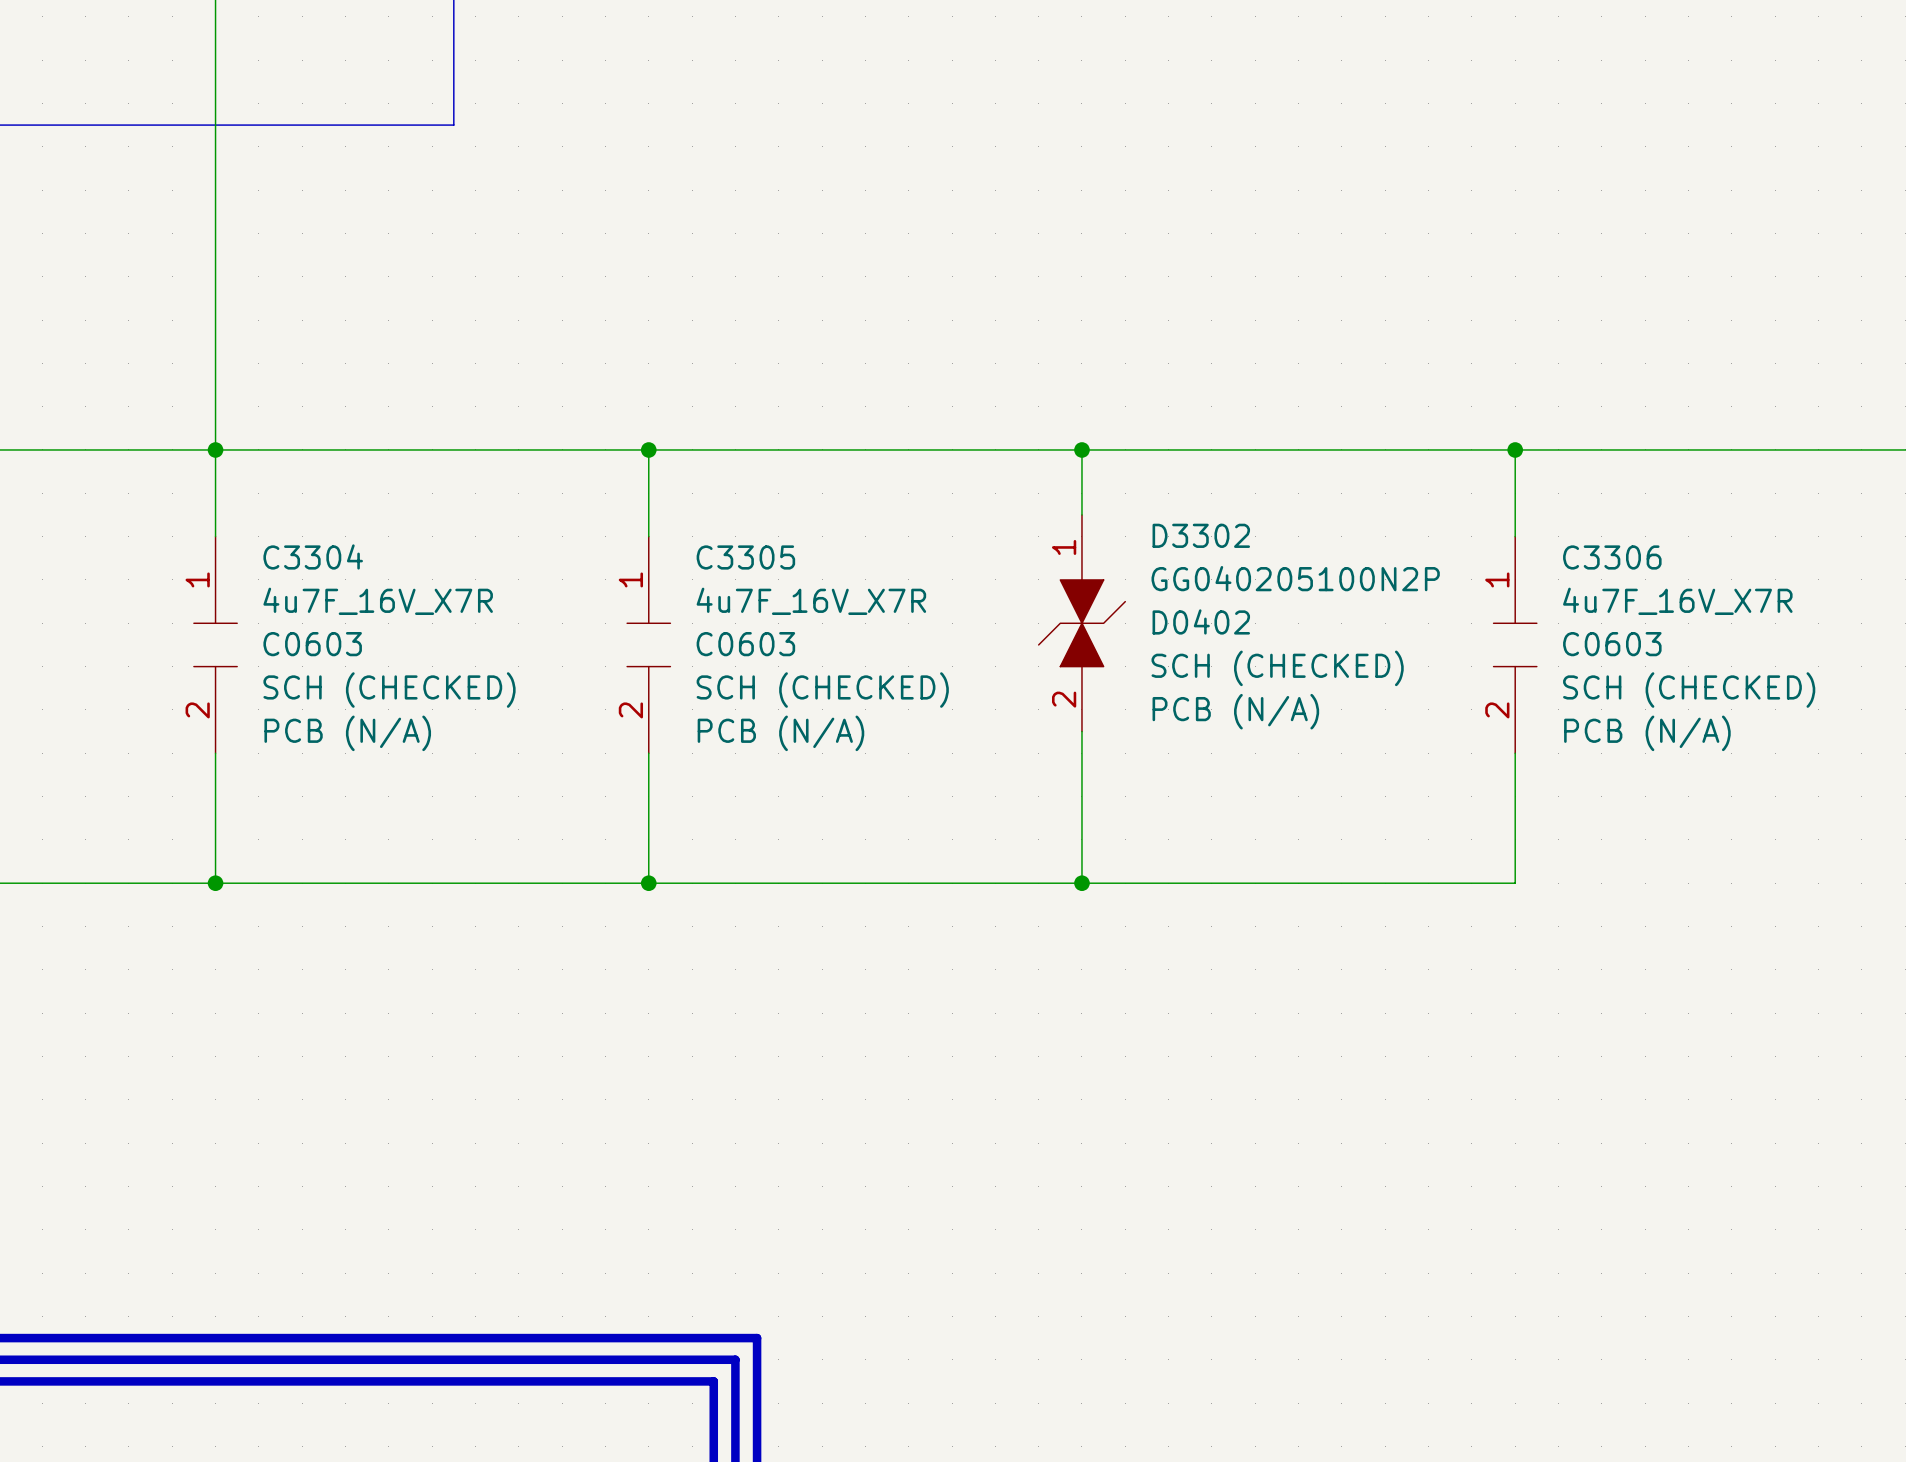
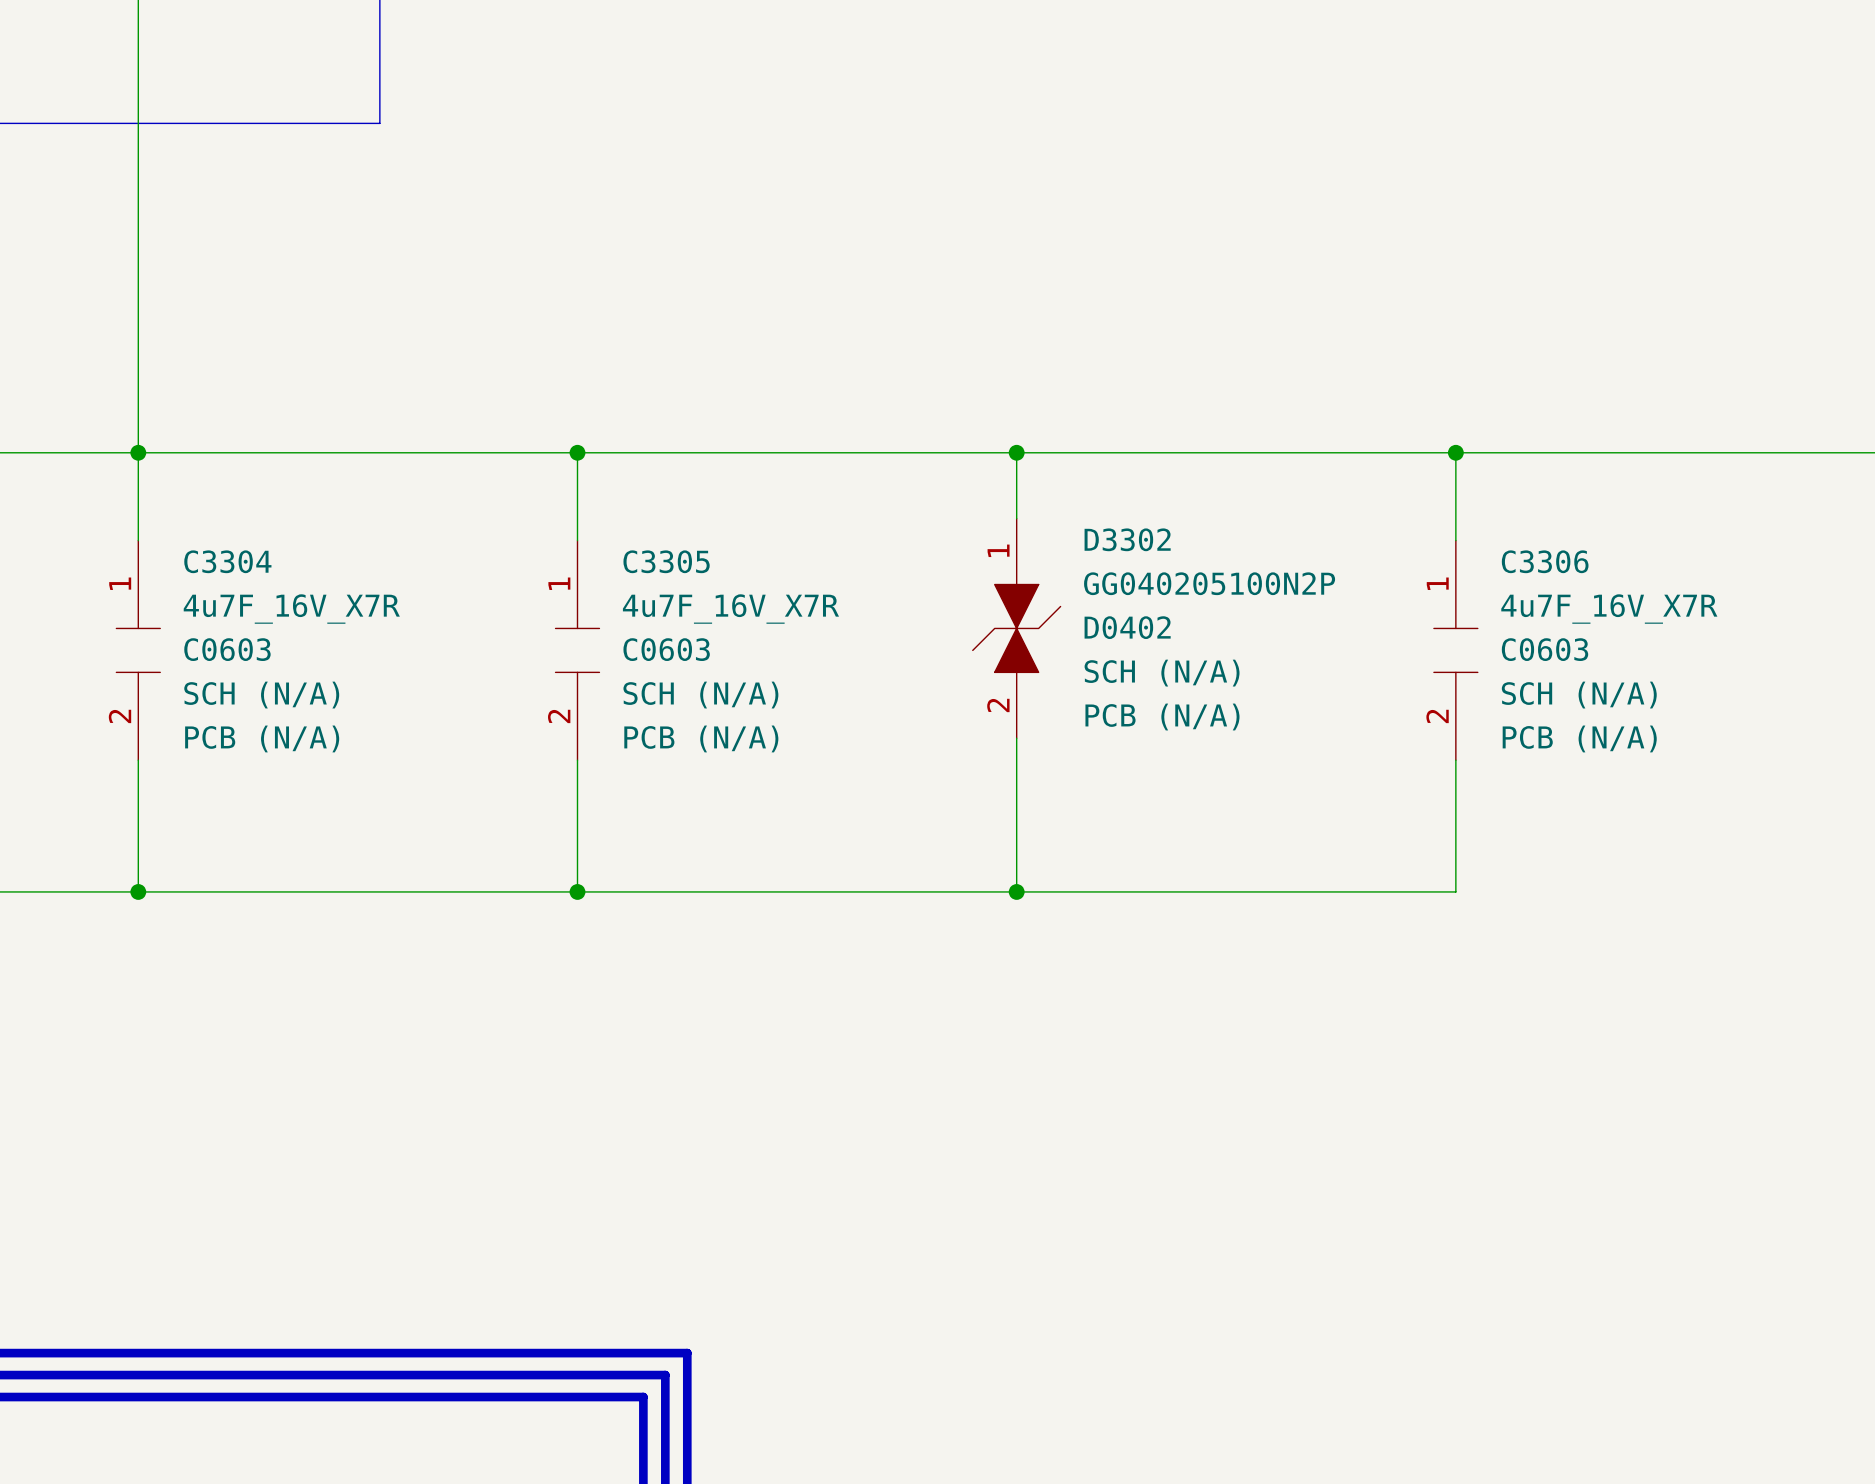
D3302 text: SCH (CHECKED) (1277, 668) -> SCH (N/A) (1162, 673)
C3304 text: SCH (CHECKED) (389, 690) -> SCH (N/A) (261, 695)
C3305 text: SCH (CHECKED) (822, 690) -> SCH (N/A) (700, 695)
C3306 text: SCH (CHECKED) (1689, 690) -> SCH (N/A) (1579, 695)

